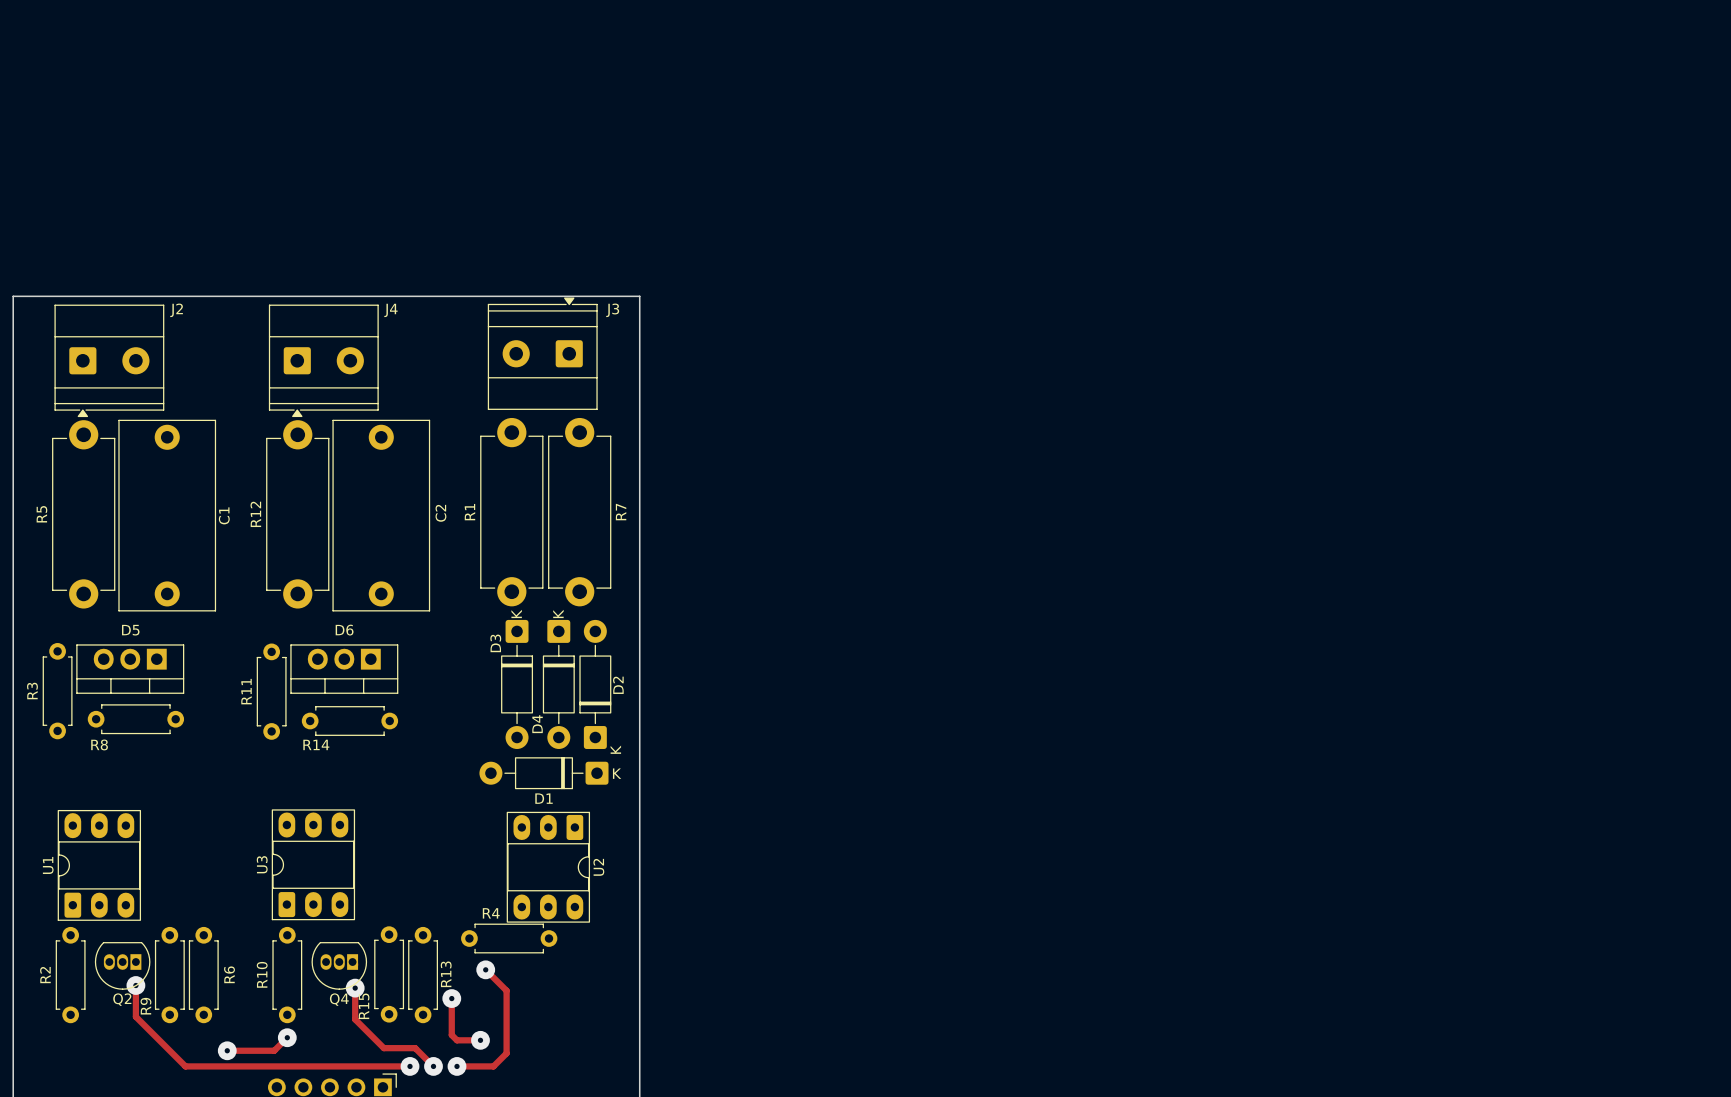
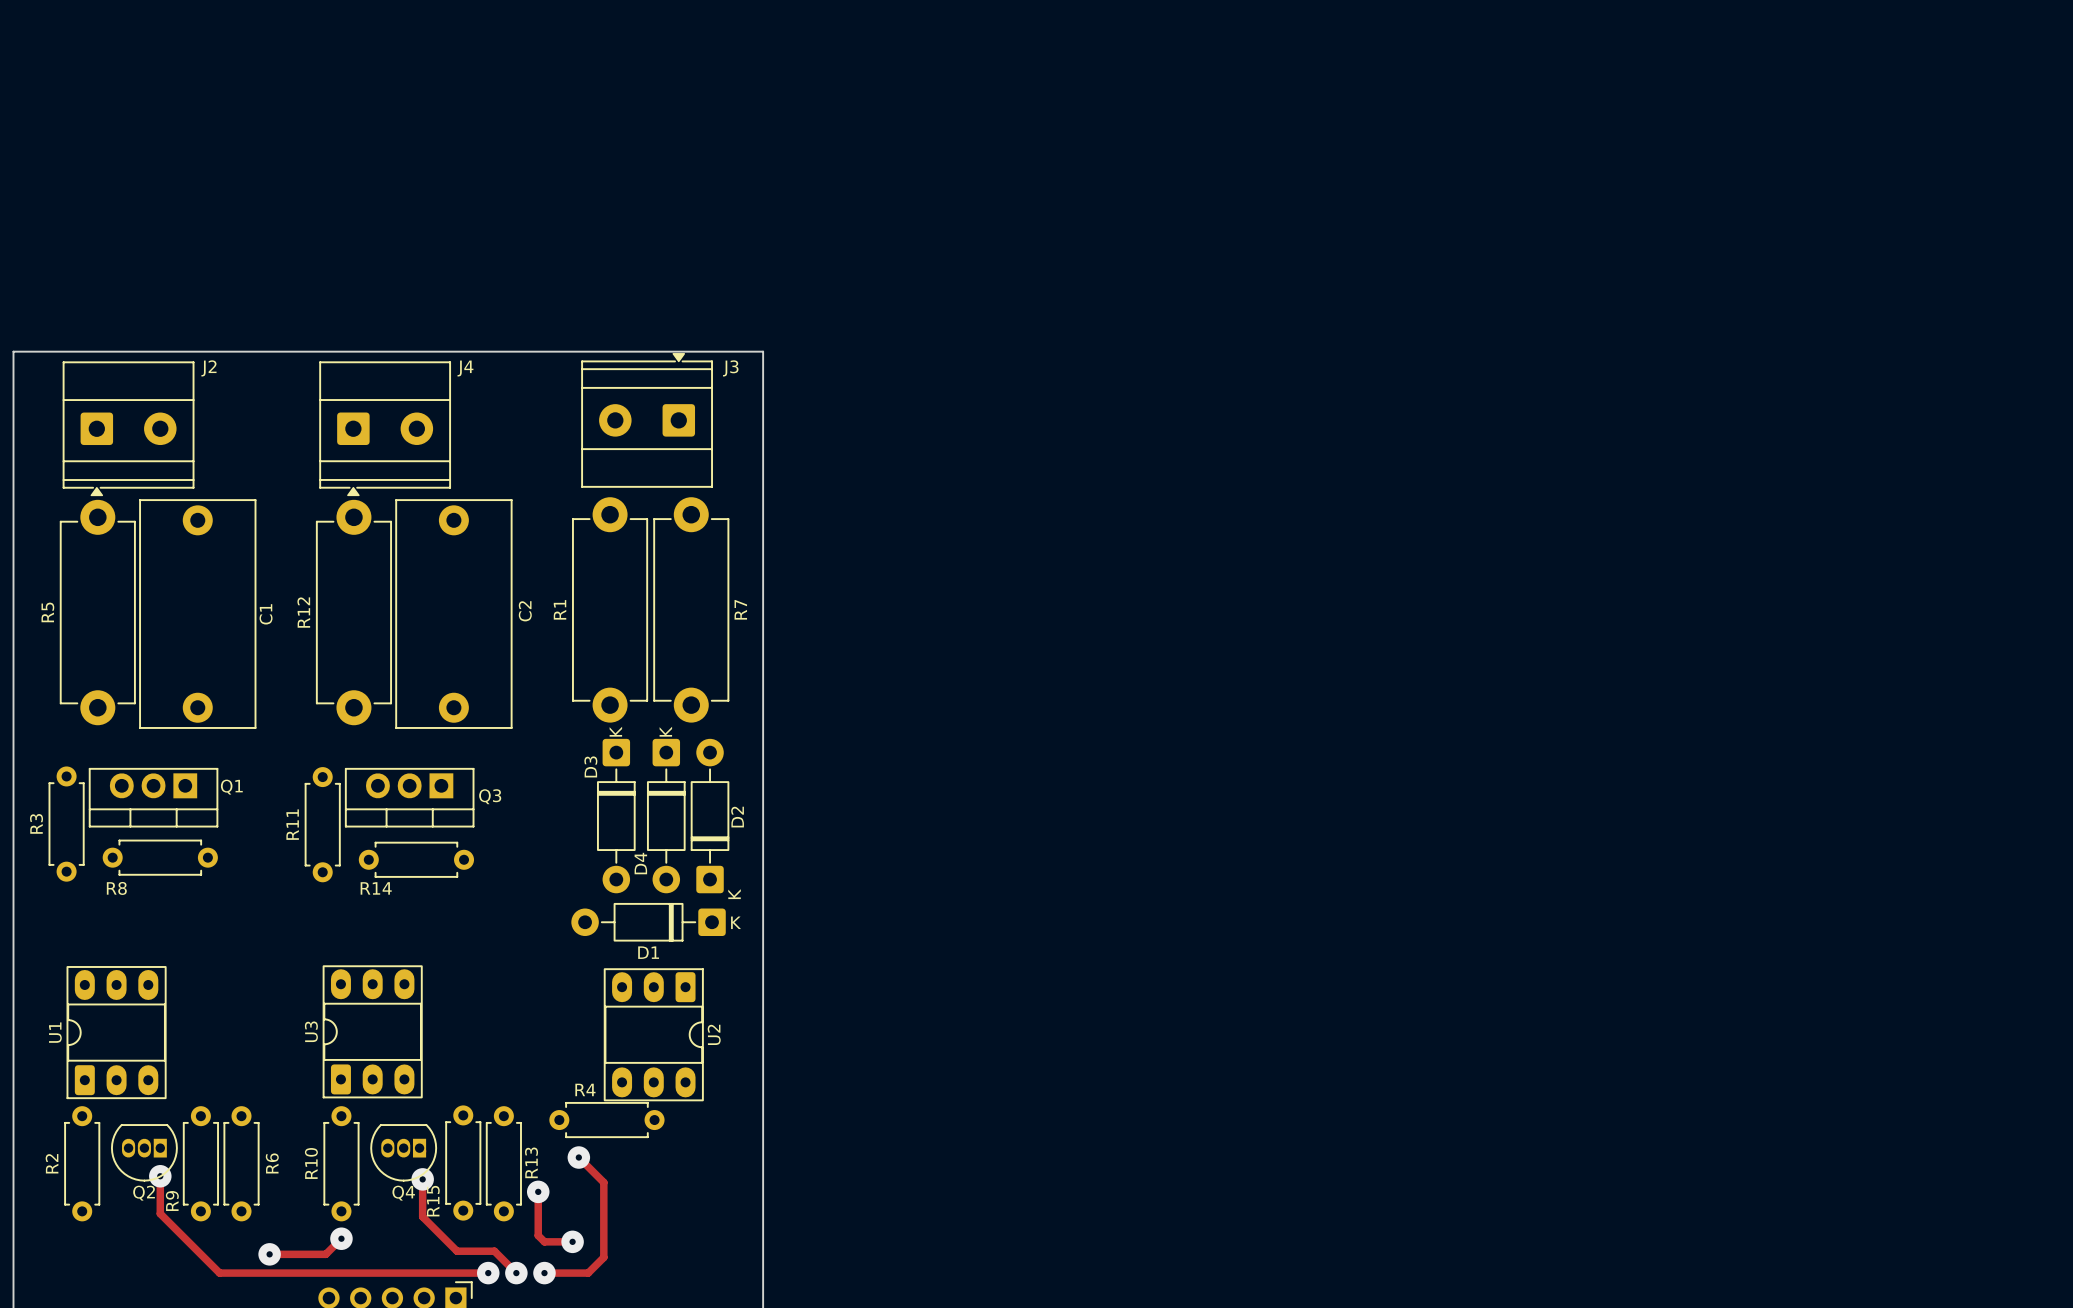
D5 name: D5 (130, 630) -> Q1 (231, 787)
D6 name: D6 (344, 630) -> Q3 (490, 796)

